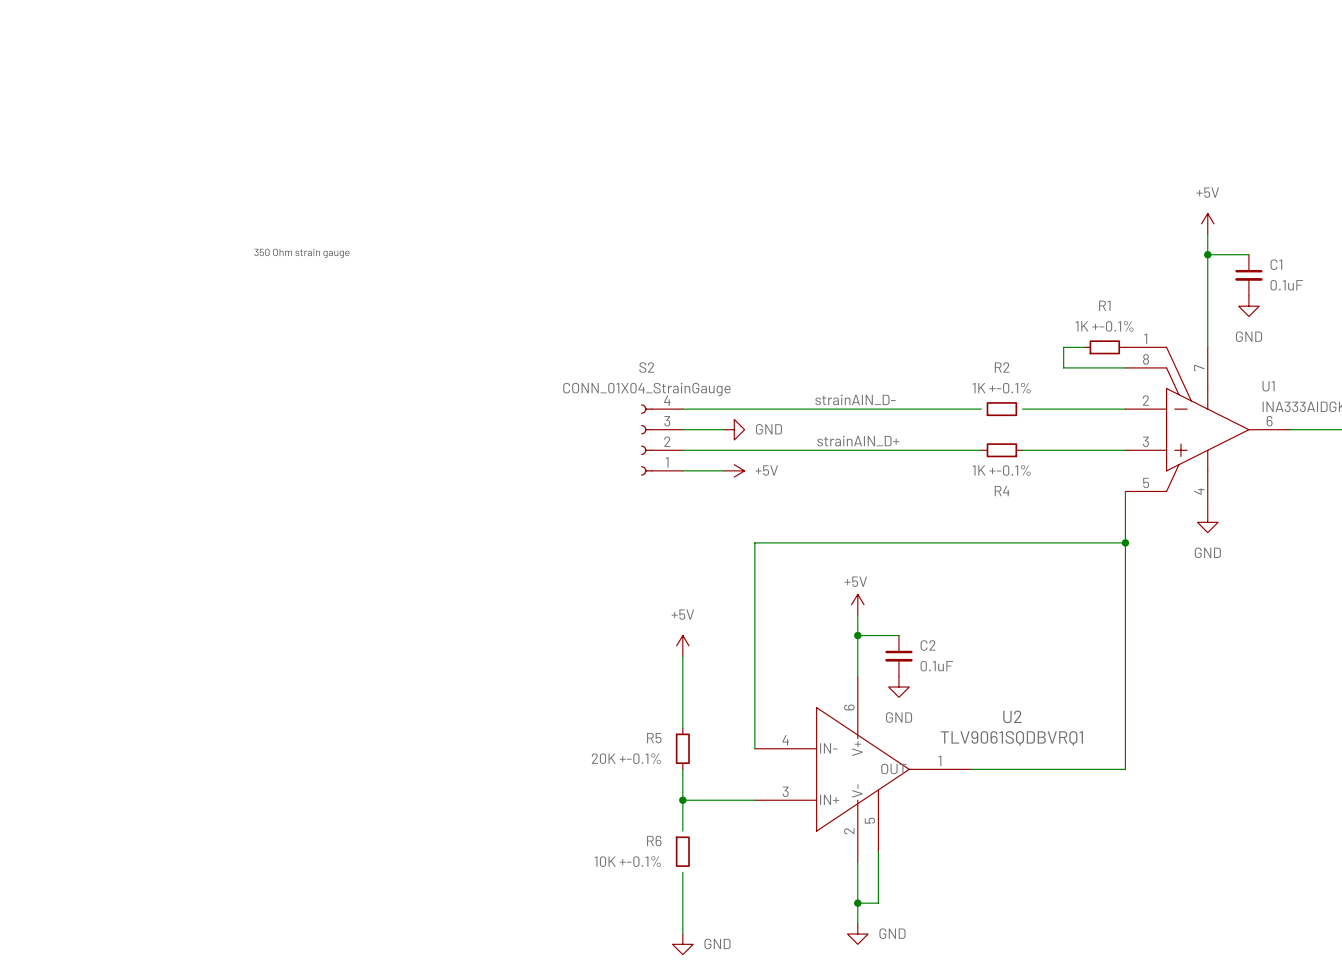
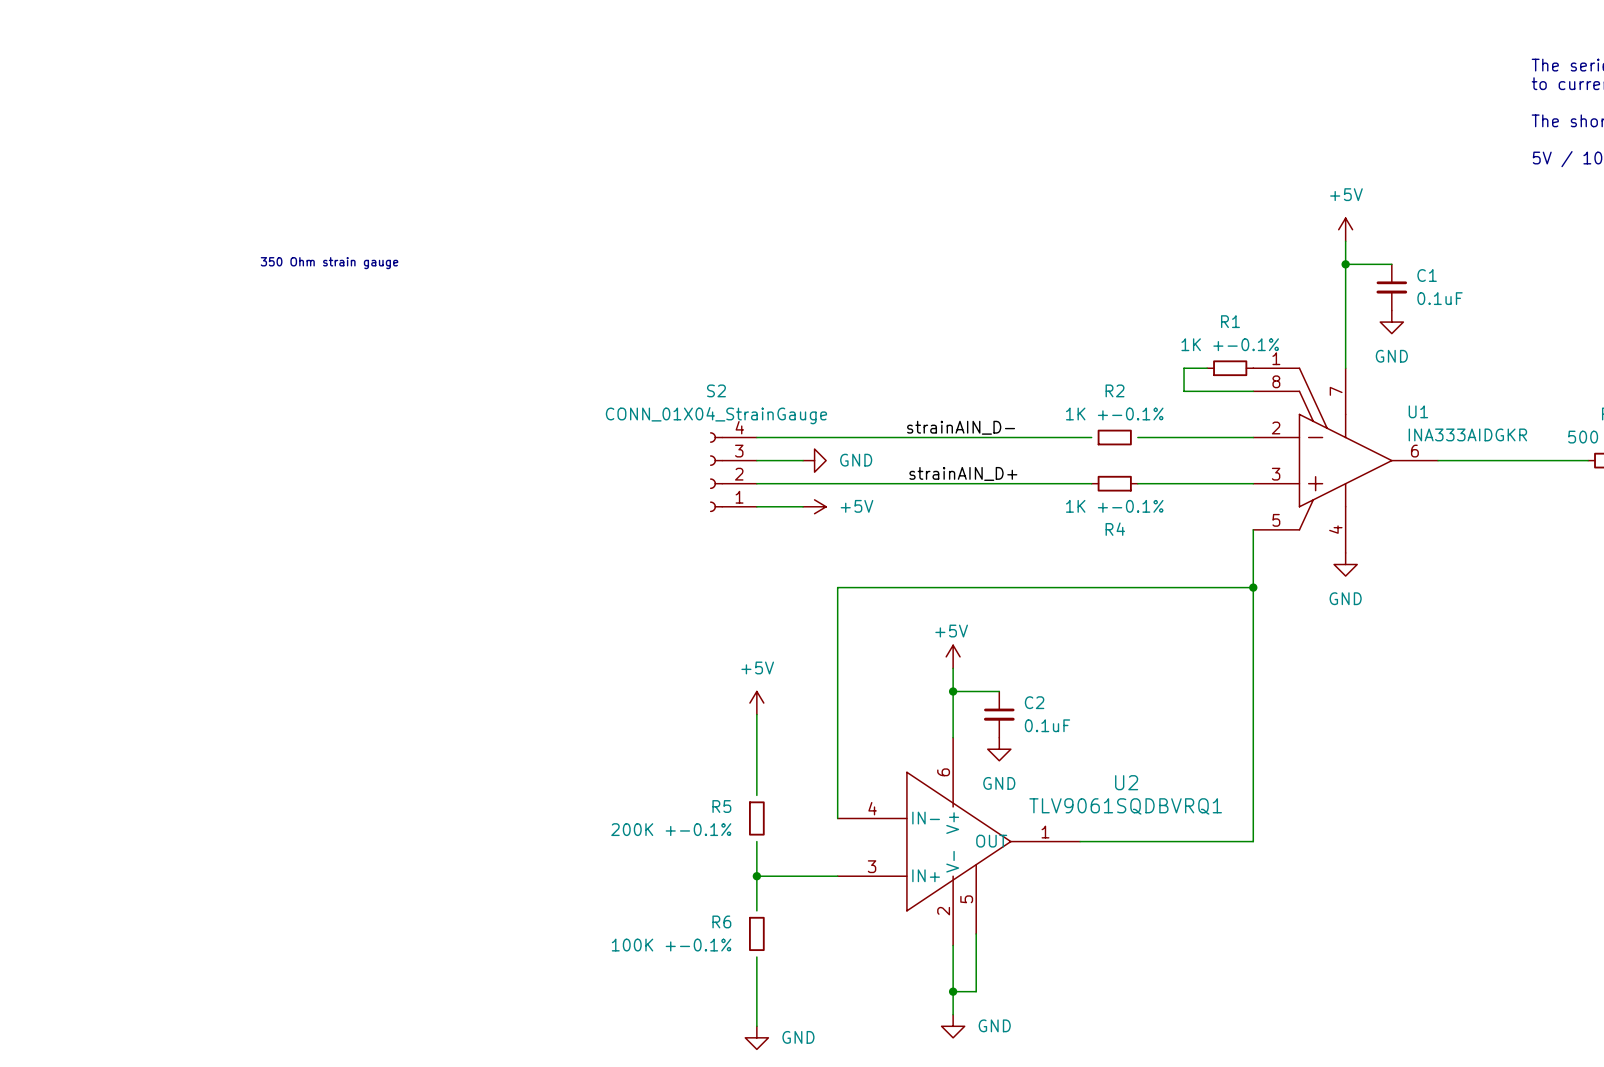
R5 symbol: [675, 728, 690, 770] -> [749, 801, 765, 836]
R5 value: 20K +-0.1% (626, 758) -> 200K +-0.1% (671, 829)
R6 value: 10K +-0.1% (627, 861) -> 100K +-0.1% (671, 945)

